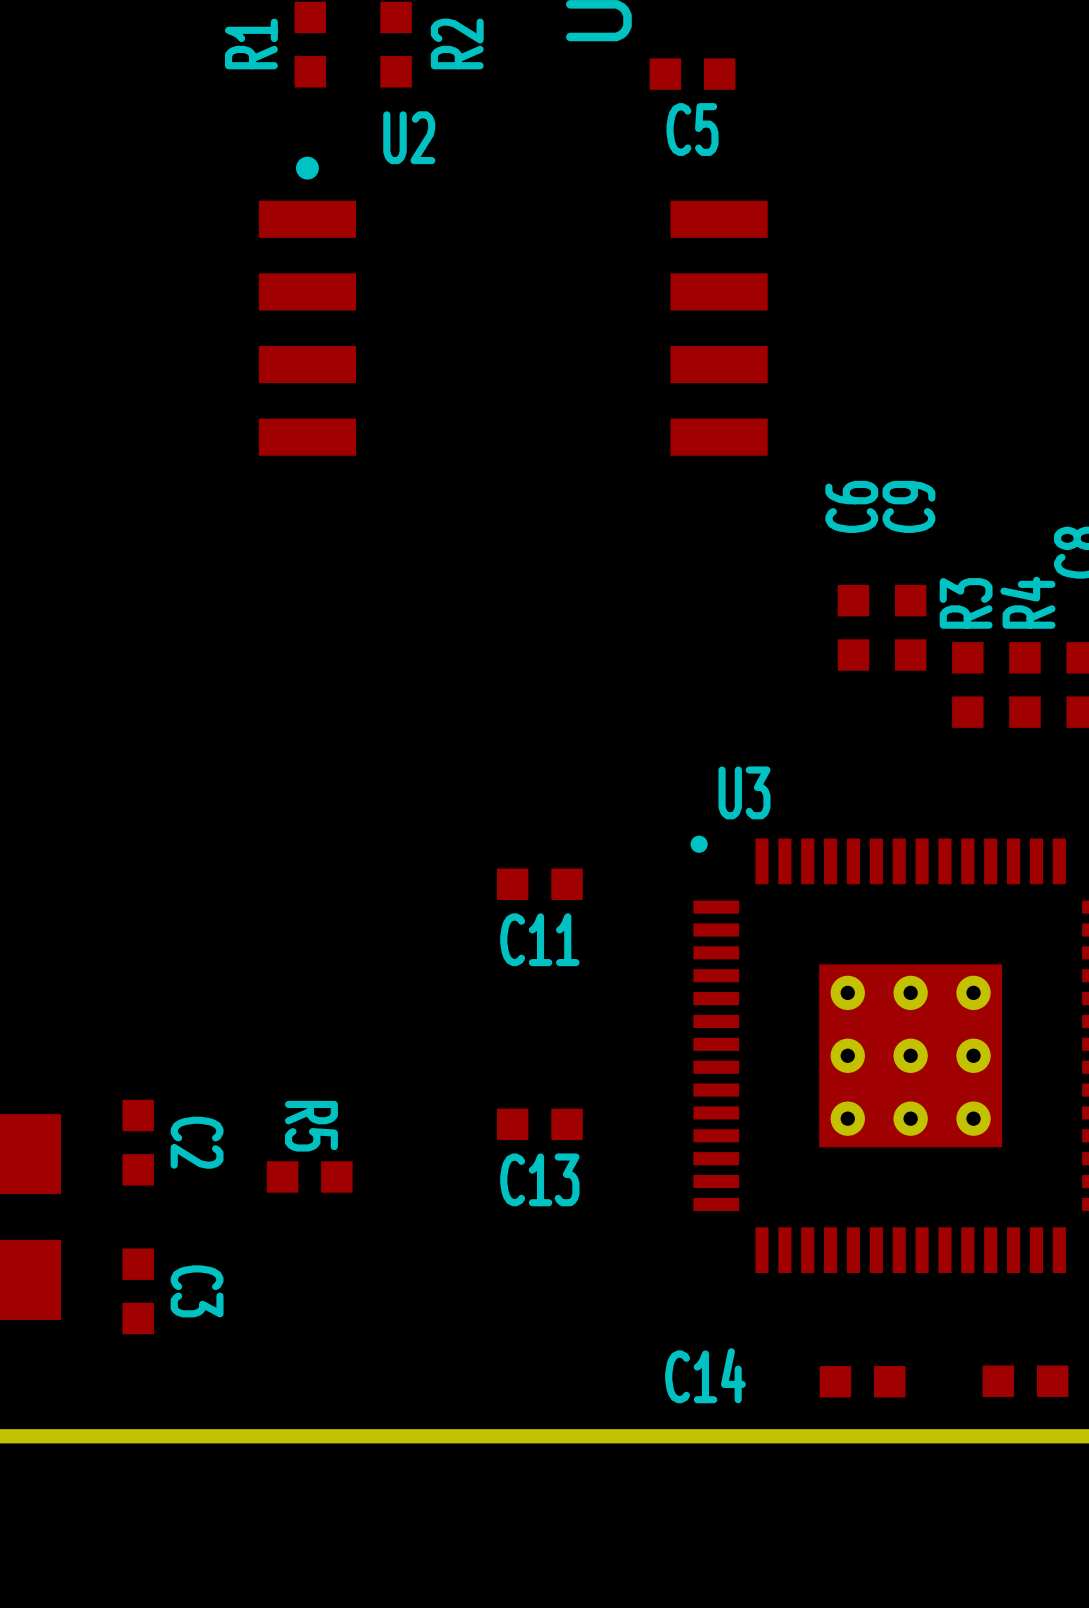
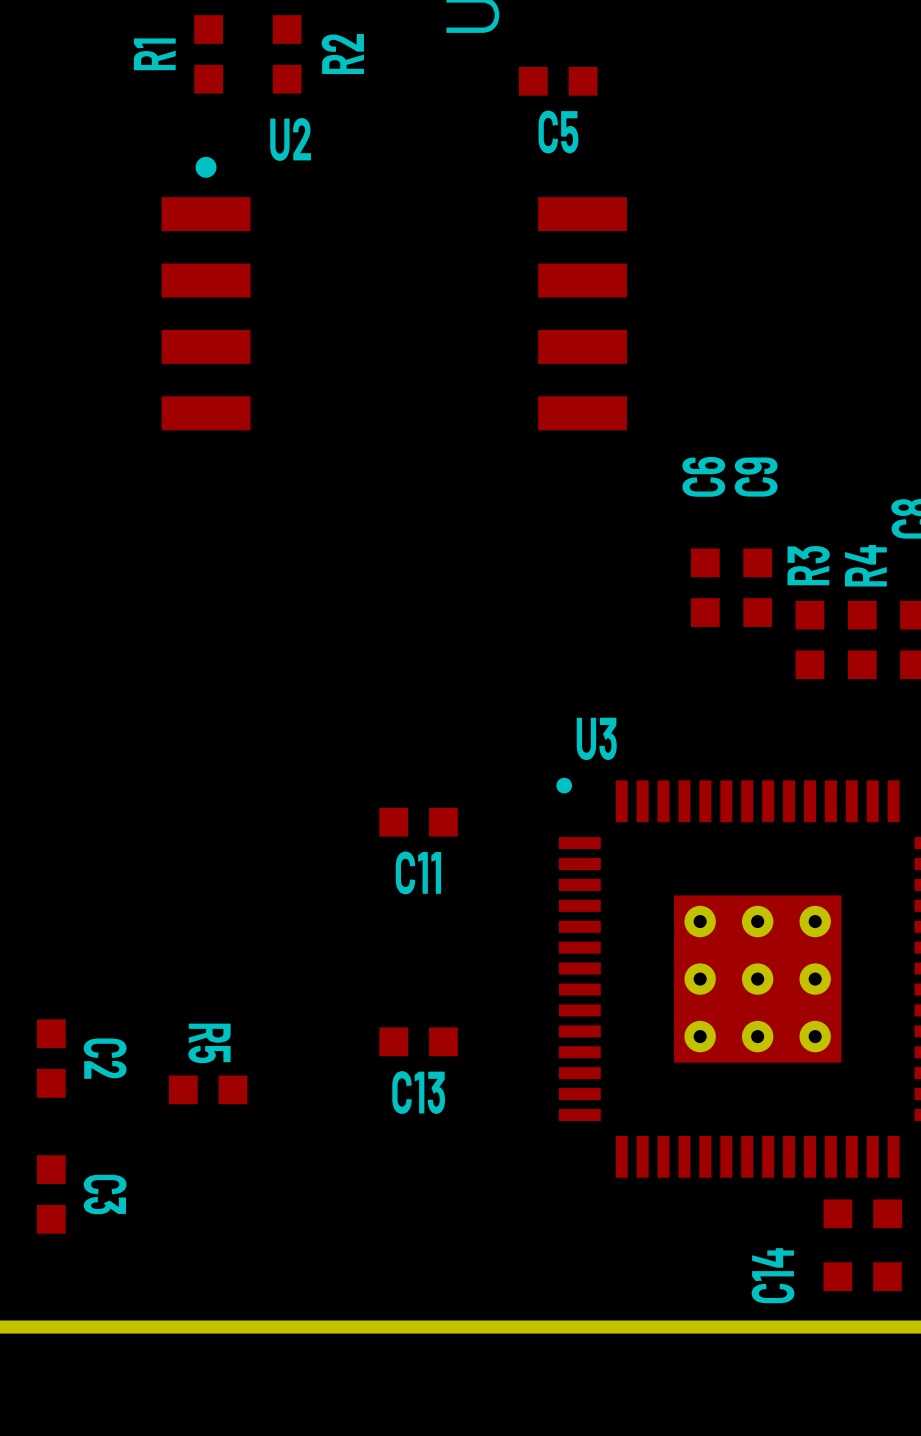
part: none -> (862, 1213)
C14 name: none -> C14 (773, 1275)
C14: (862, 1381) -> none

